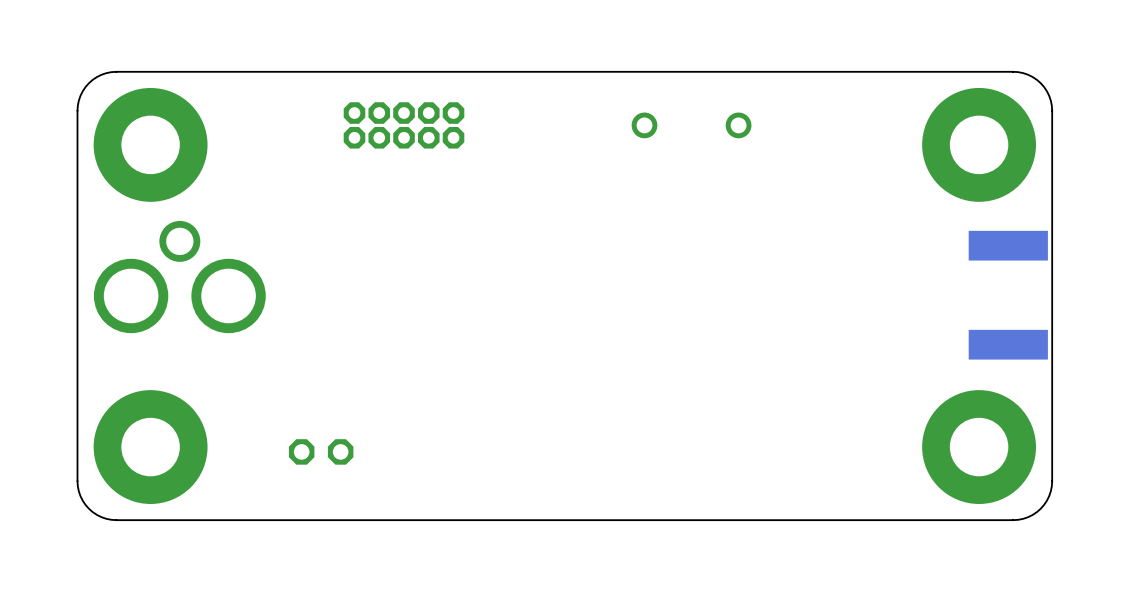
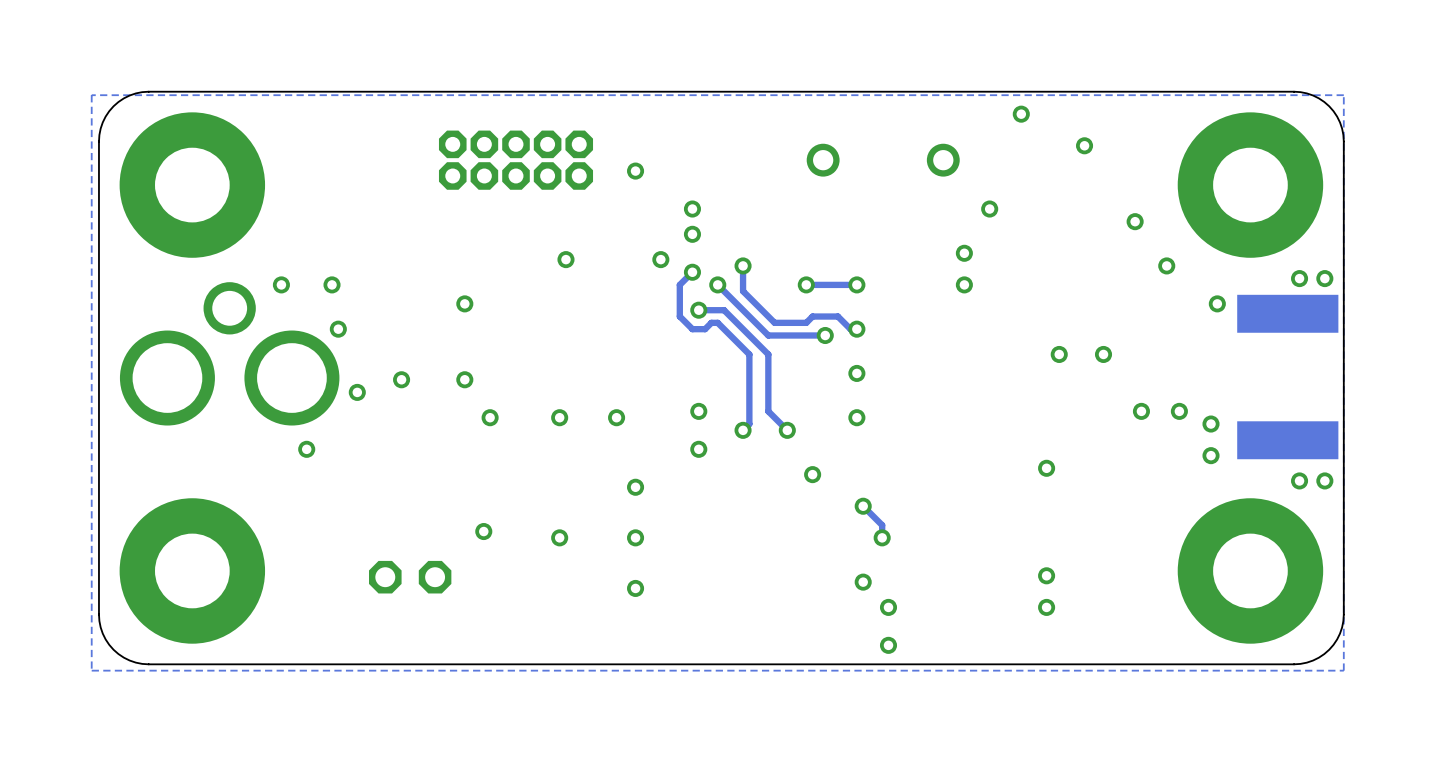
zone outline: none -> (1343, 95) (91, 95) (91, 670) (1343, 670) (1343, 95)
via: none -> (1021, 114)
via: none -> (1084, 145)
via: none -> (635, 171)
via: none -> (692, 209)
via: none -> (989, 209)
via: none -> (1135, 221)
via: none -> (692, 234)
via: none -> (964, 253)
via: none -> (565, 259)
via: none -> (660, 259)
track: none -> (743, 265) (743, 291) (774, 322) (806, 322) (812, 316) (837, 316) (850, 329) (856, 329)
via: none -> (743, 265)
via: none -> (1166, 265)
track: none -> (692, 272) (679, 284) (679, 316) (692, 329) (705, 329) (711, 322) (717, 322) (749, 354) (749, 424) (743, 430)
via: none -> (692, 272)
via: none -> (1299, 278)
via: none -> (1324, 278)
via: none -> (281, 284)
via: none -> (332, 284)
track: none -> (717, 284) (768, 335) (825, 335)
via: none -> (717, 284)
via: none -> (806, 284)
track: none -> (856, 284) (806, 284)
via: none -> (856, 284)
via: none -> (964, 284)
via: none -> (464, 303)
via: none -> (1217, 303)
track: none -> (698, 310) (724, 310) (768, 354) (768, 411) (787, 430)
via: none -> (698, 310)
via: none -> (338, 329)
via: none -> (856, 329)
via: none -> (825, 335)
via: none -> (1059, 354)
via: none -> (1103, 354)
via: none -> (856, 373)
via: none -> (401, 379)
via: none -> (464, 379)
via: none -> (357, 392)
via: none -> (698, 411)
via: none -> (1141, 411)
via: none -> (1179, 411)
via: none -> (490, 417)
via: none -> (559, 417)
via: none -> (616, 417)
via: none -> (856, 417)
via: none -> (1211, 424)
via: none -> (743, 430)
via: none -> (787, 430)
via: none -> (306, 449)
via: none -> (698, 449)
via: none -> (1211, 455)
via: none -> (1046, 468)
via: none -> (812, 474)
via: none -> (1299, 480)
via: none -> (1324, 480)
via: none -> (635, 487)
track: none -> (863, 506) (882, 525) (882, 537)
via: none -> (863, 506)
via: none -> (483, 531)
via: none -> (559, 537)
via: none -> (635, 537)
via: none -> (882, 537)
via: none -> (1046, 575)
via: none -> (863, 582)
via: none -> (635, 588)
via: none -> (888, 607)
via: none -> (1046, 607)
via: none -> (888, 645)

